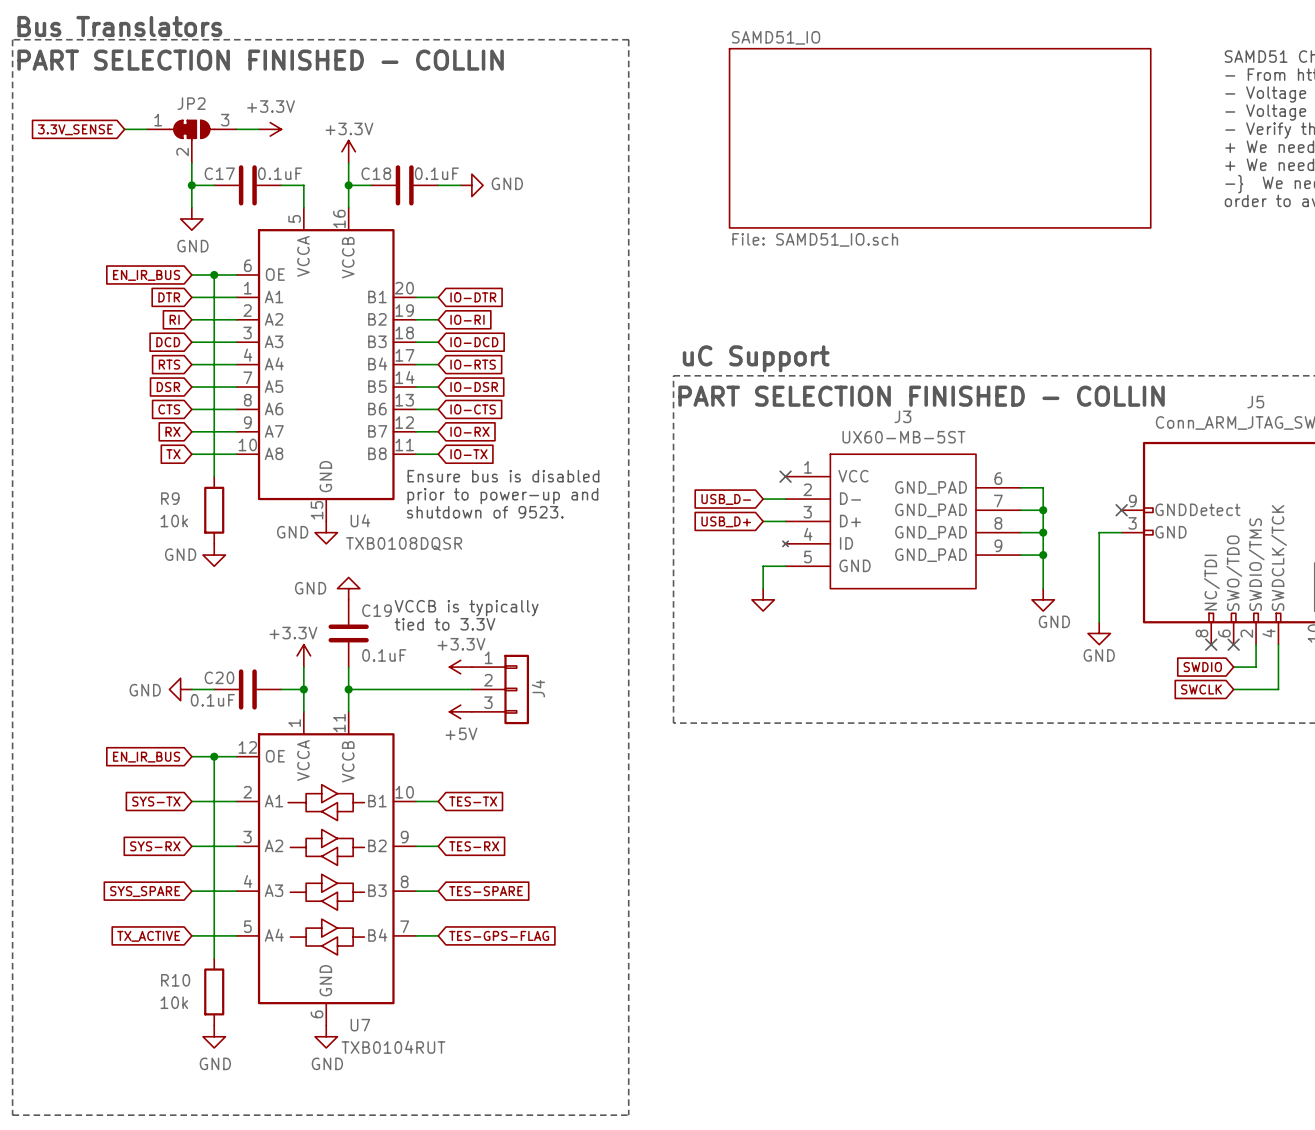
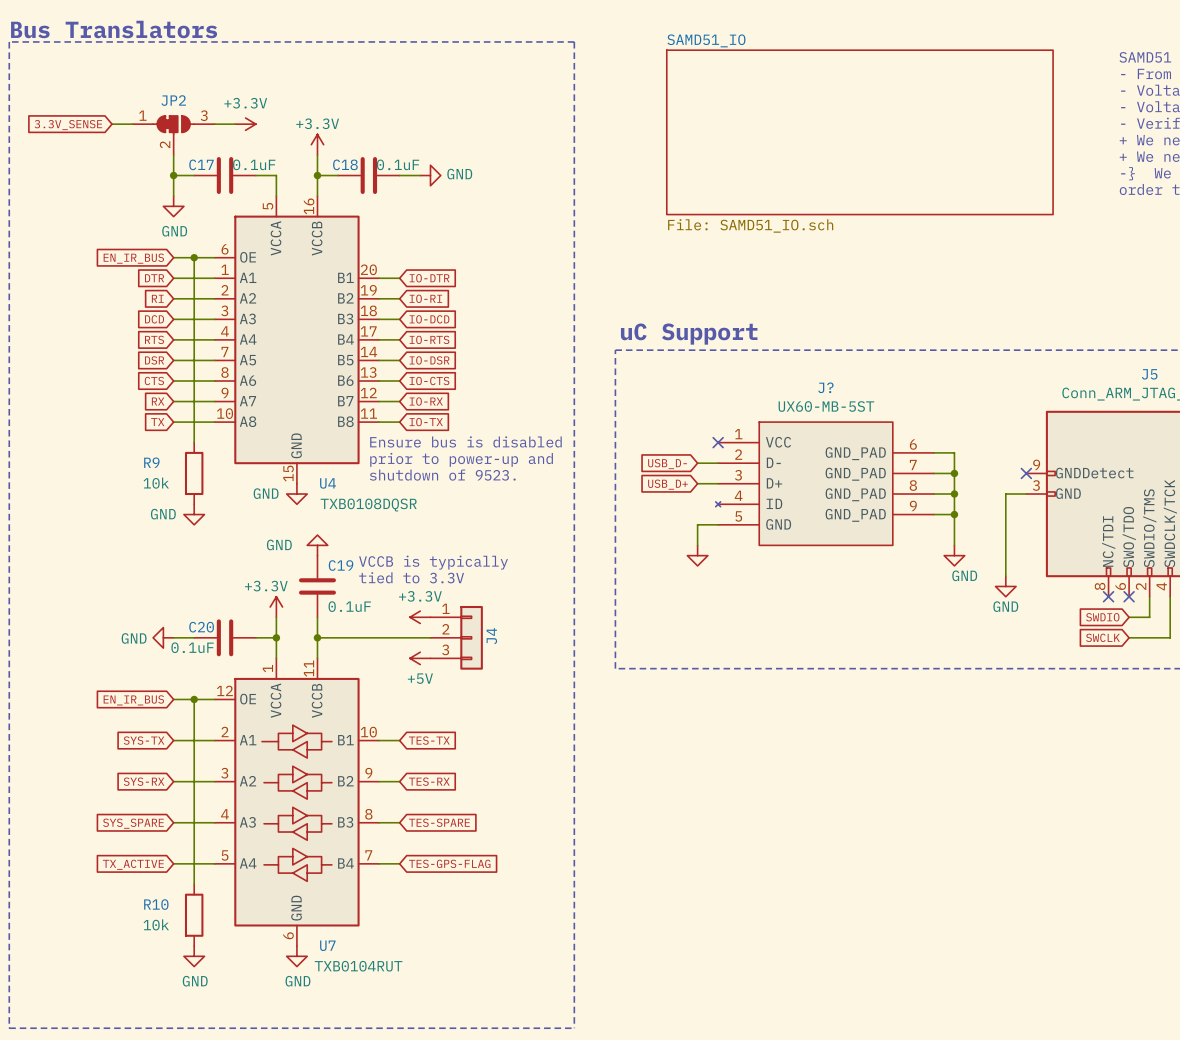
text: PART SELECTION FINISHED - COLLIN (260, 60) -> none
text: PART SELECTION FINISHED - COLLIN (921, 396) -> none
J3 name: J3 (902, 416) -> J? (825, 387)

